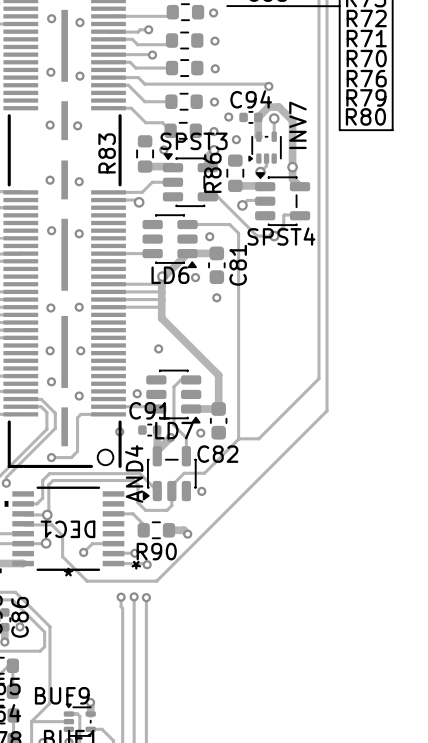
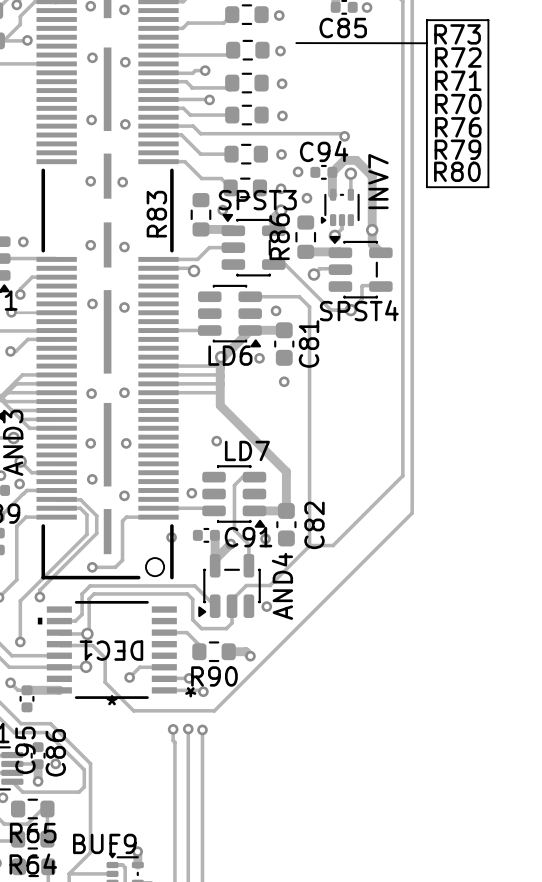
C91 name position: C91 (149, 410) -> C91 (248, 537)
LD7 name position: LD7 (174, 430) -> LD7 (247, 450)
C82 name rotation: 0° (217, 454) -> 90° counterclockwise (314, 525)
AND4 name position: AND4 (134, 474) -> AND4 (282, 586)

